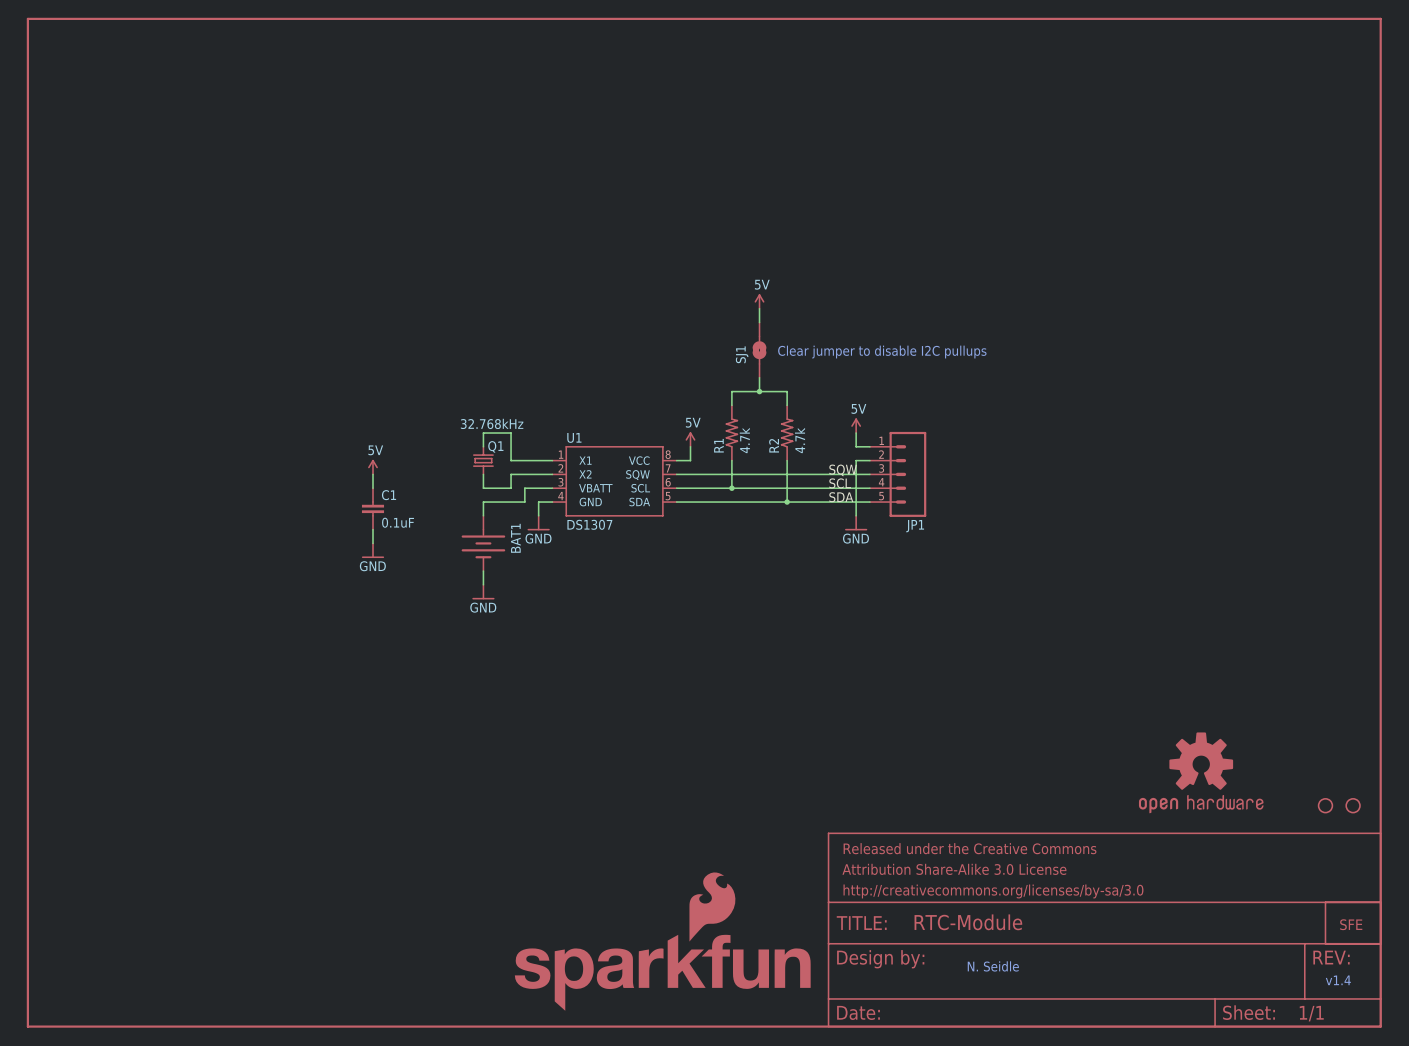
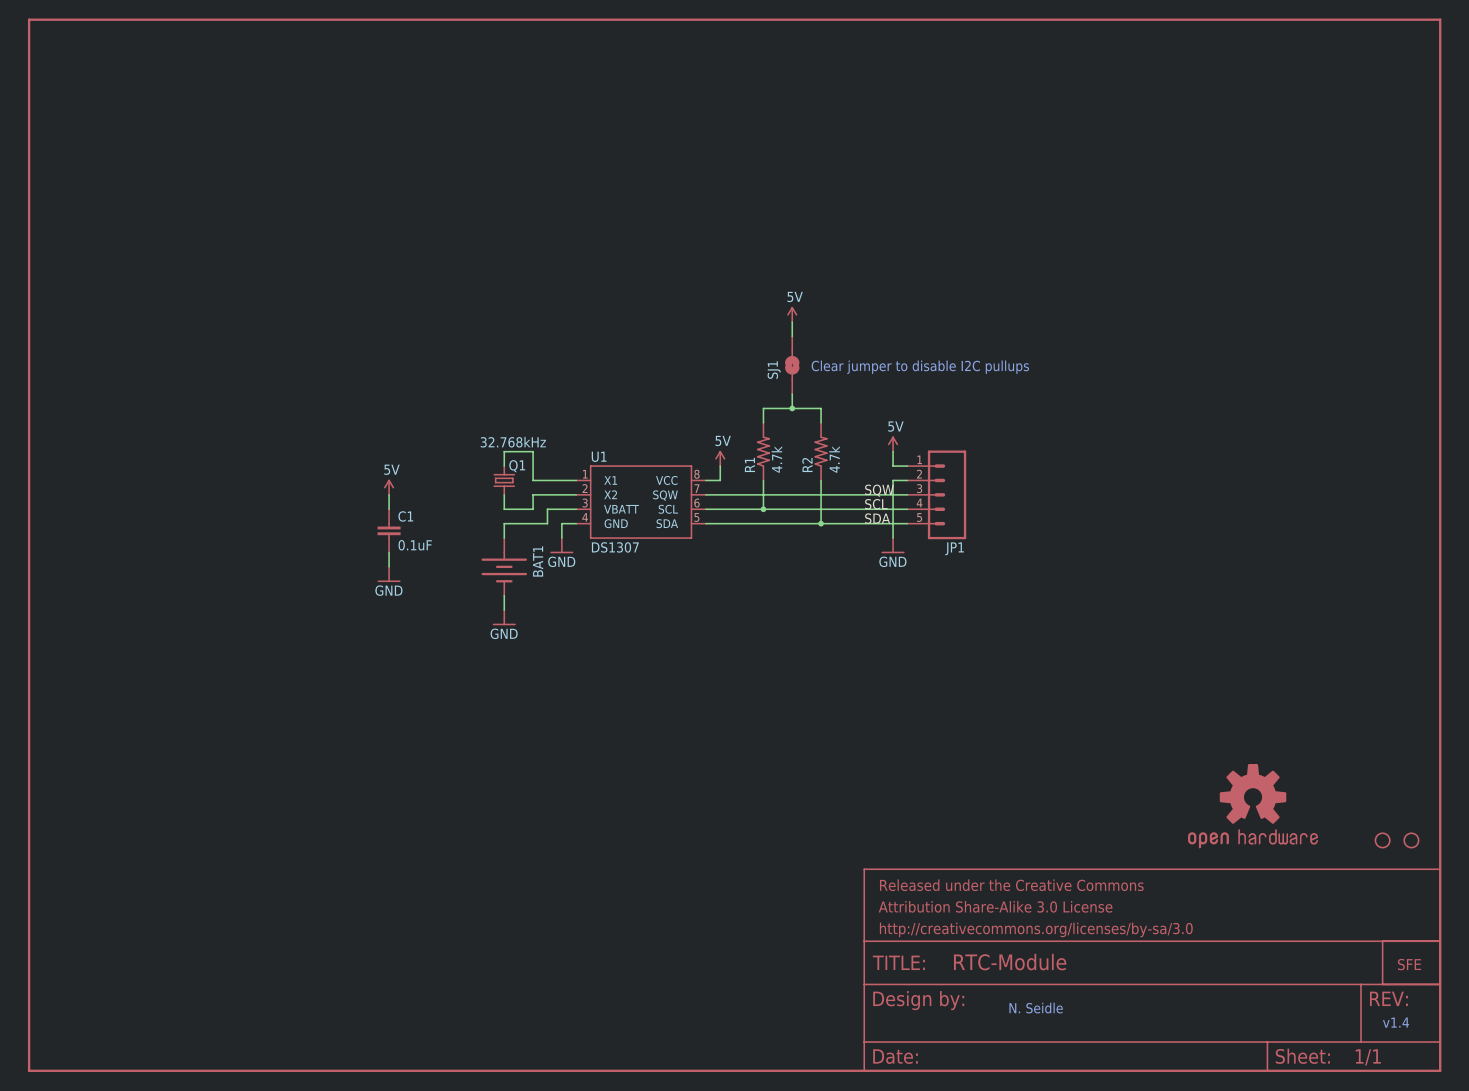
part: (662, 941) -> none

